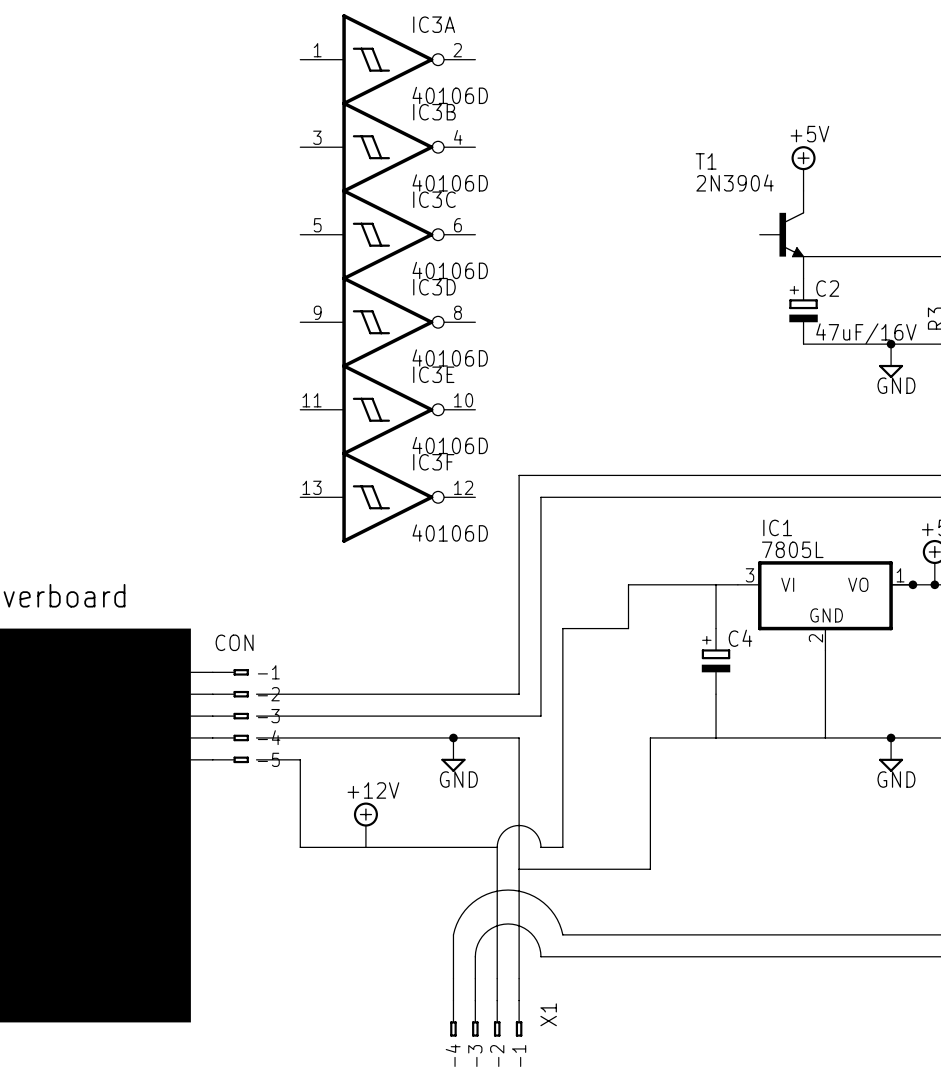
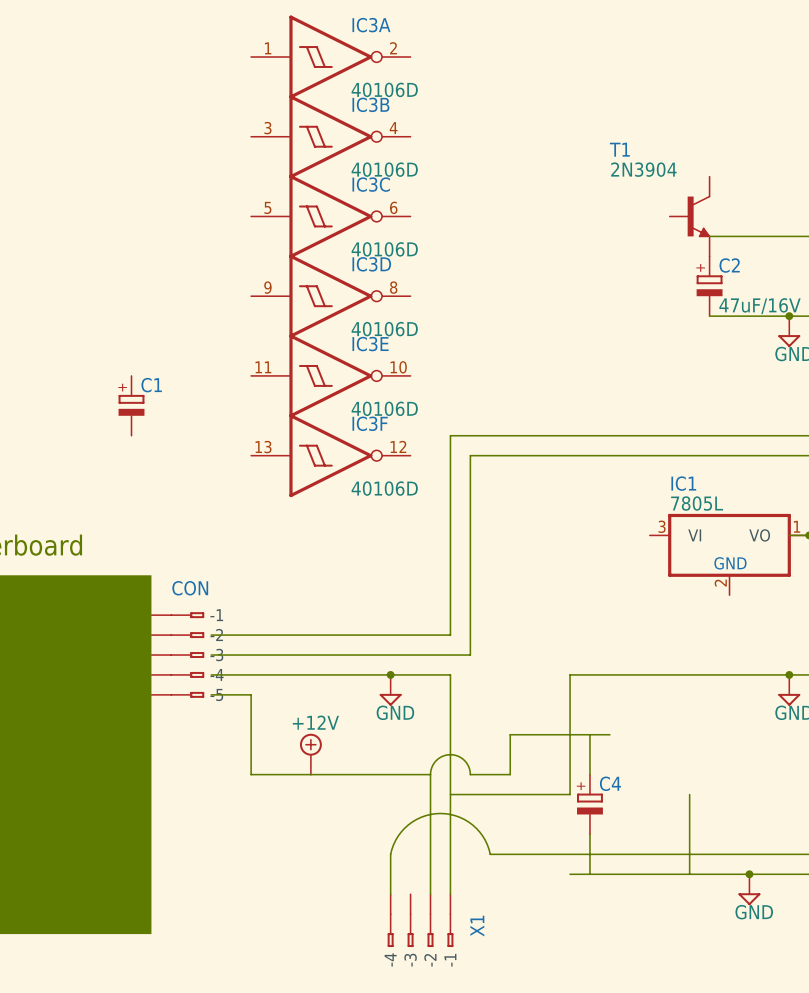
power symbol: +5V (803, 168) -> none
C1: none -> (131, 405)
wire: (716, 584) (716, 628) -> none
wire: (737, 584) (628, 584) (628, 628) (562, 628) (562, 847) -> (609, 734) (510, 734) (510, 774) (490, 774)
wire: (825, 650) (825, 737) -> none
C4 position: (716, 661) -> (589, 804)
wire: (716, 694) (716, 737) -> (589, 734) (589, 774)
wire: none -> (689, 794) (689, 874)
wire: none -> (589, 834) (589, 874)
wire: (650, 956) (540, 956) (538, 944) (531, 933) (520, 926) (503, 924) (491, 928) (479, 940) (475, 952) (475, 978) -> none
junction: none -> (749, 874)
power symbol: none -> GND (749, 889)

